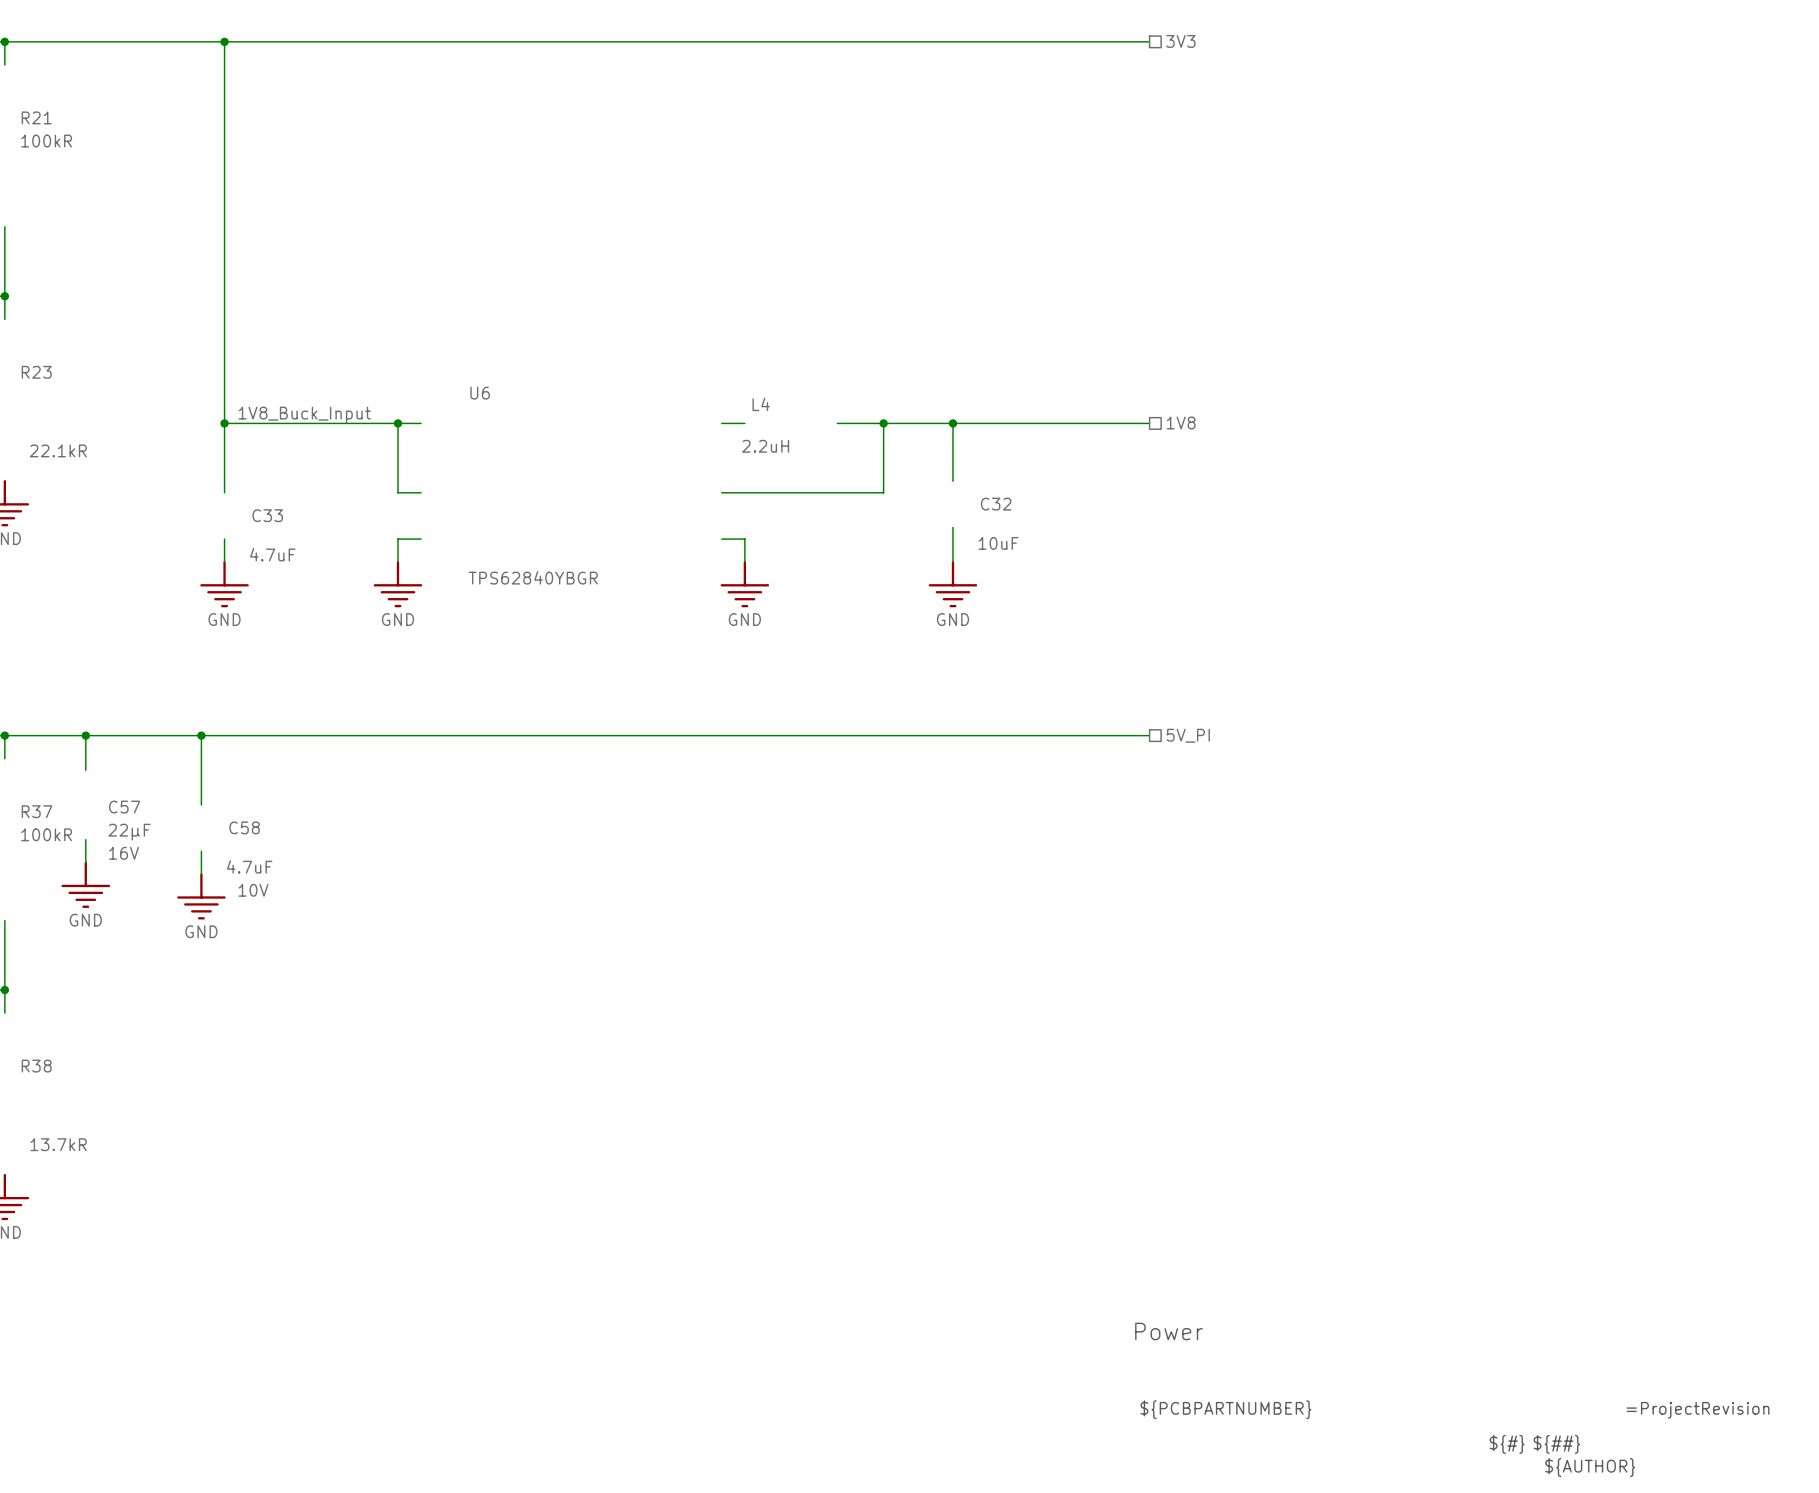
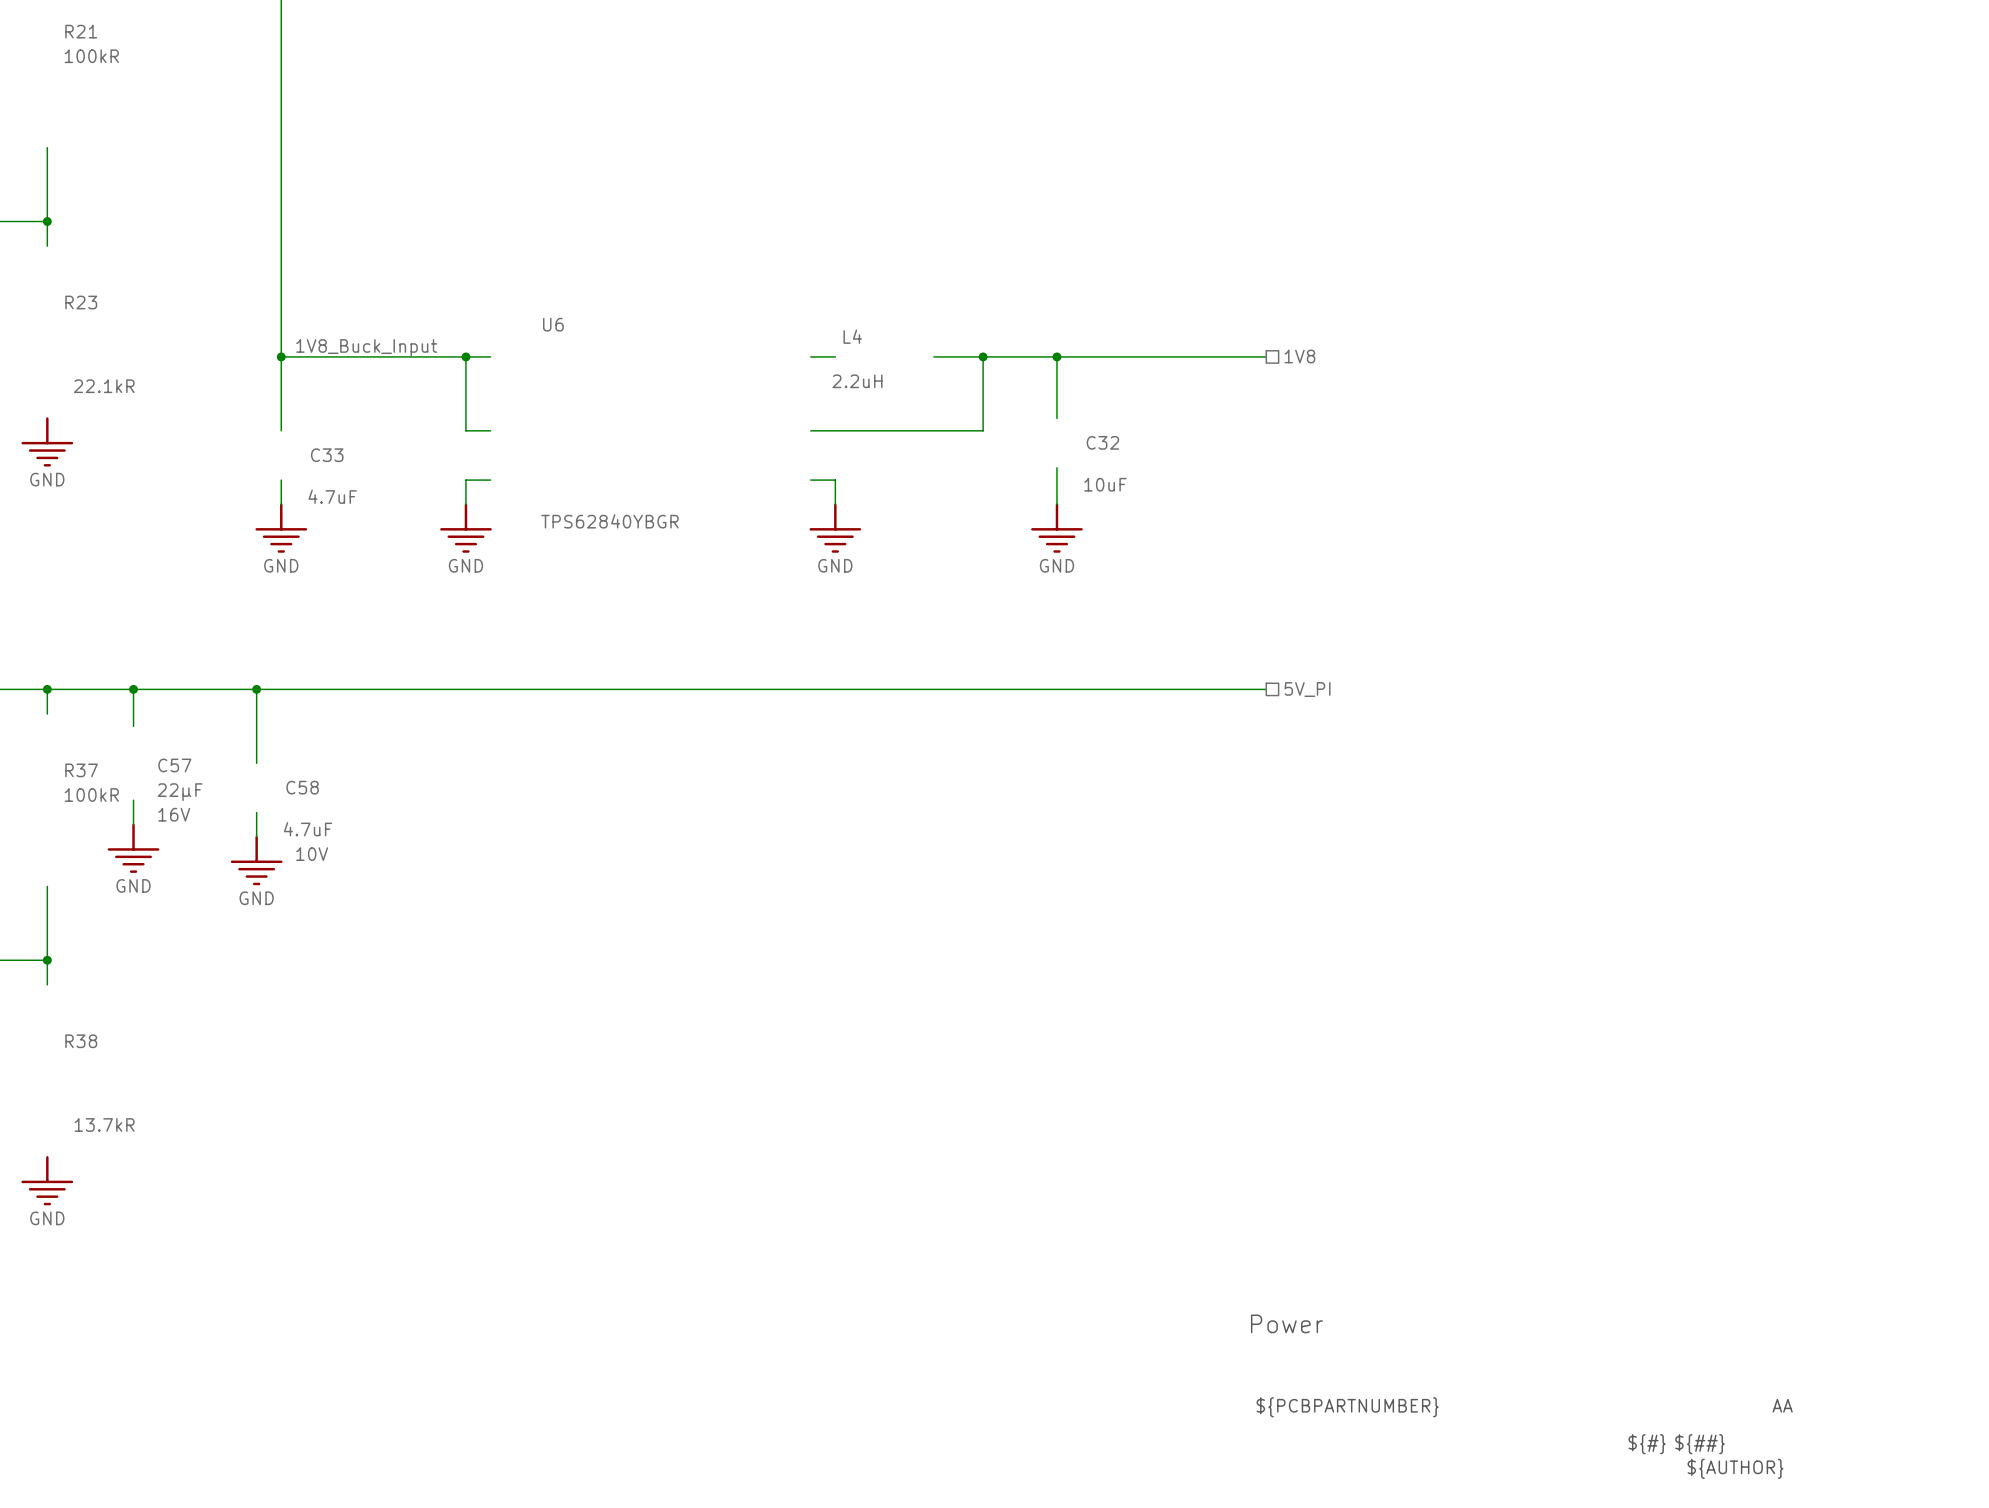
text: =ProjectRevision (1698, 1410) -> AA (1782, 1405)

